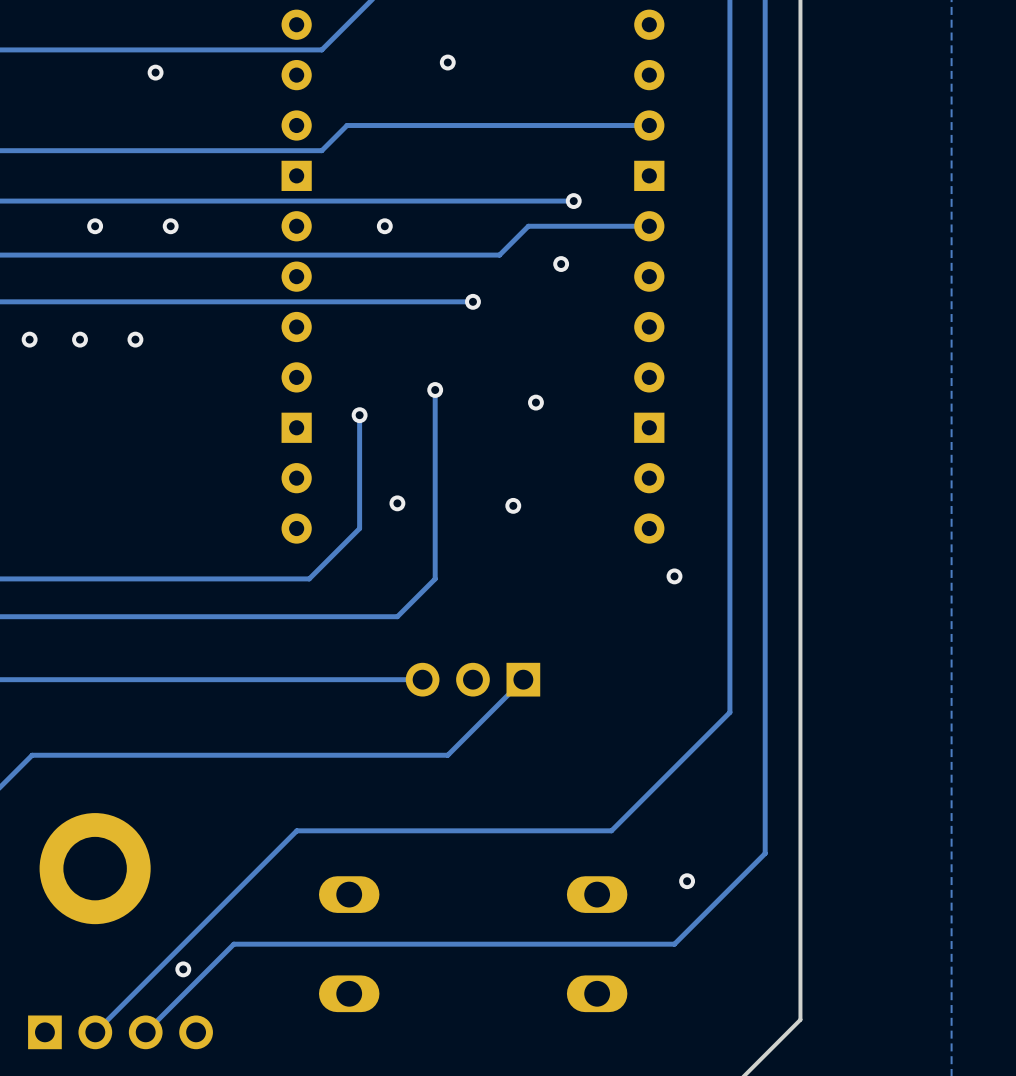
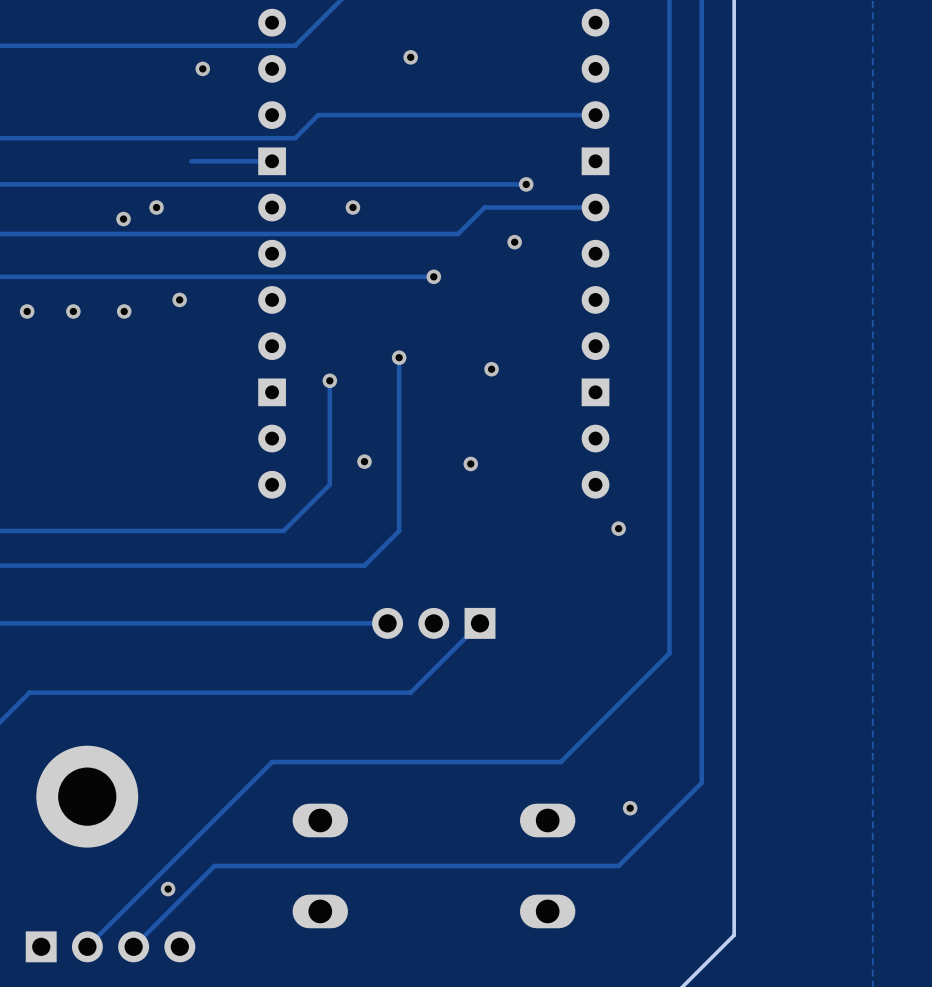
via position: (155, 72) -> (202, 68)
track: none -> (272, 161) (191, 161)
via position: (95, 226) -> (123, 219)
via: none -> (179, 299)

